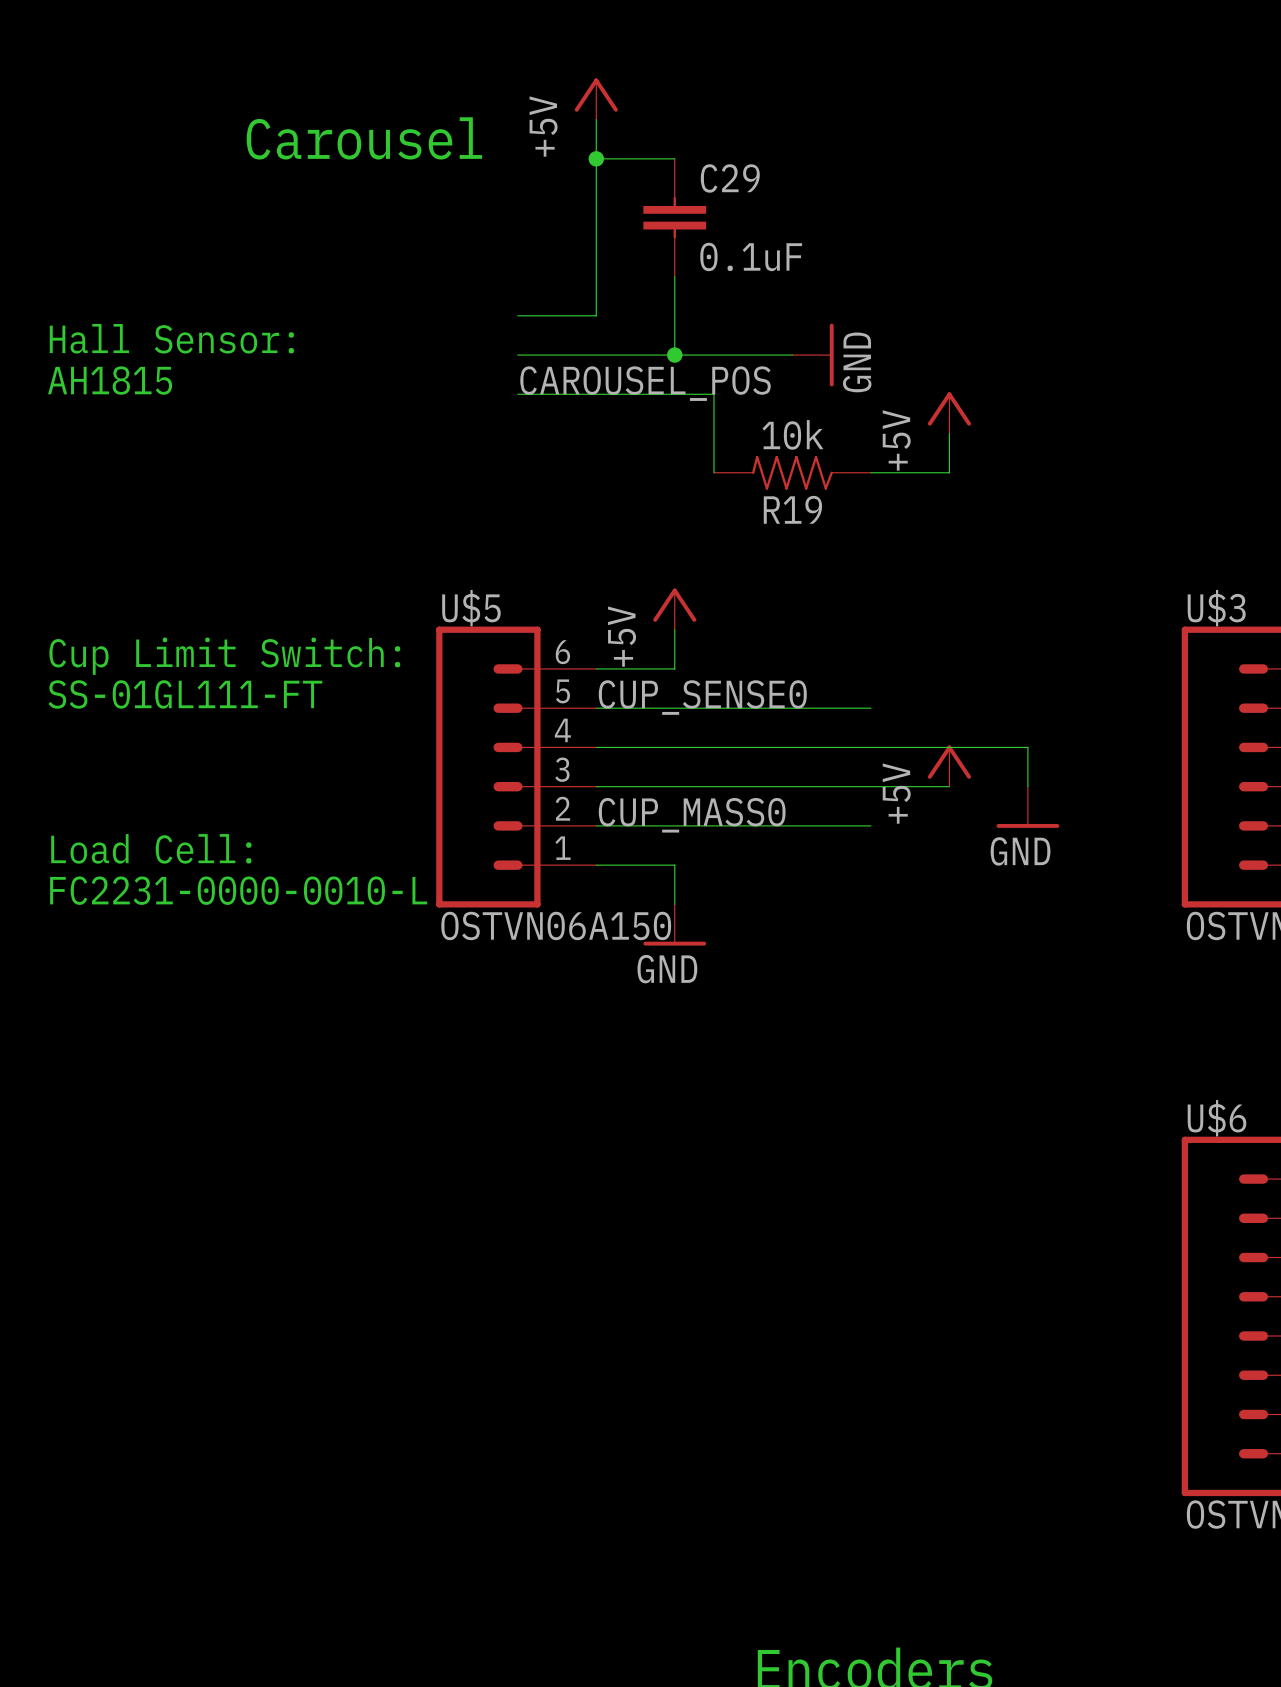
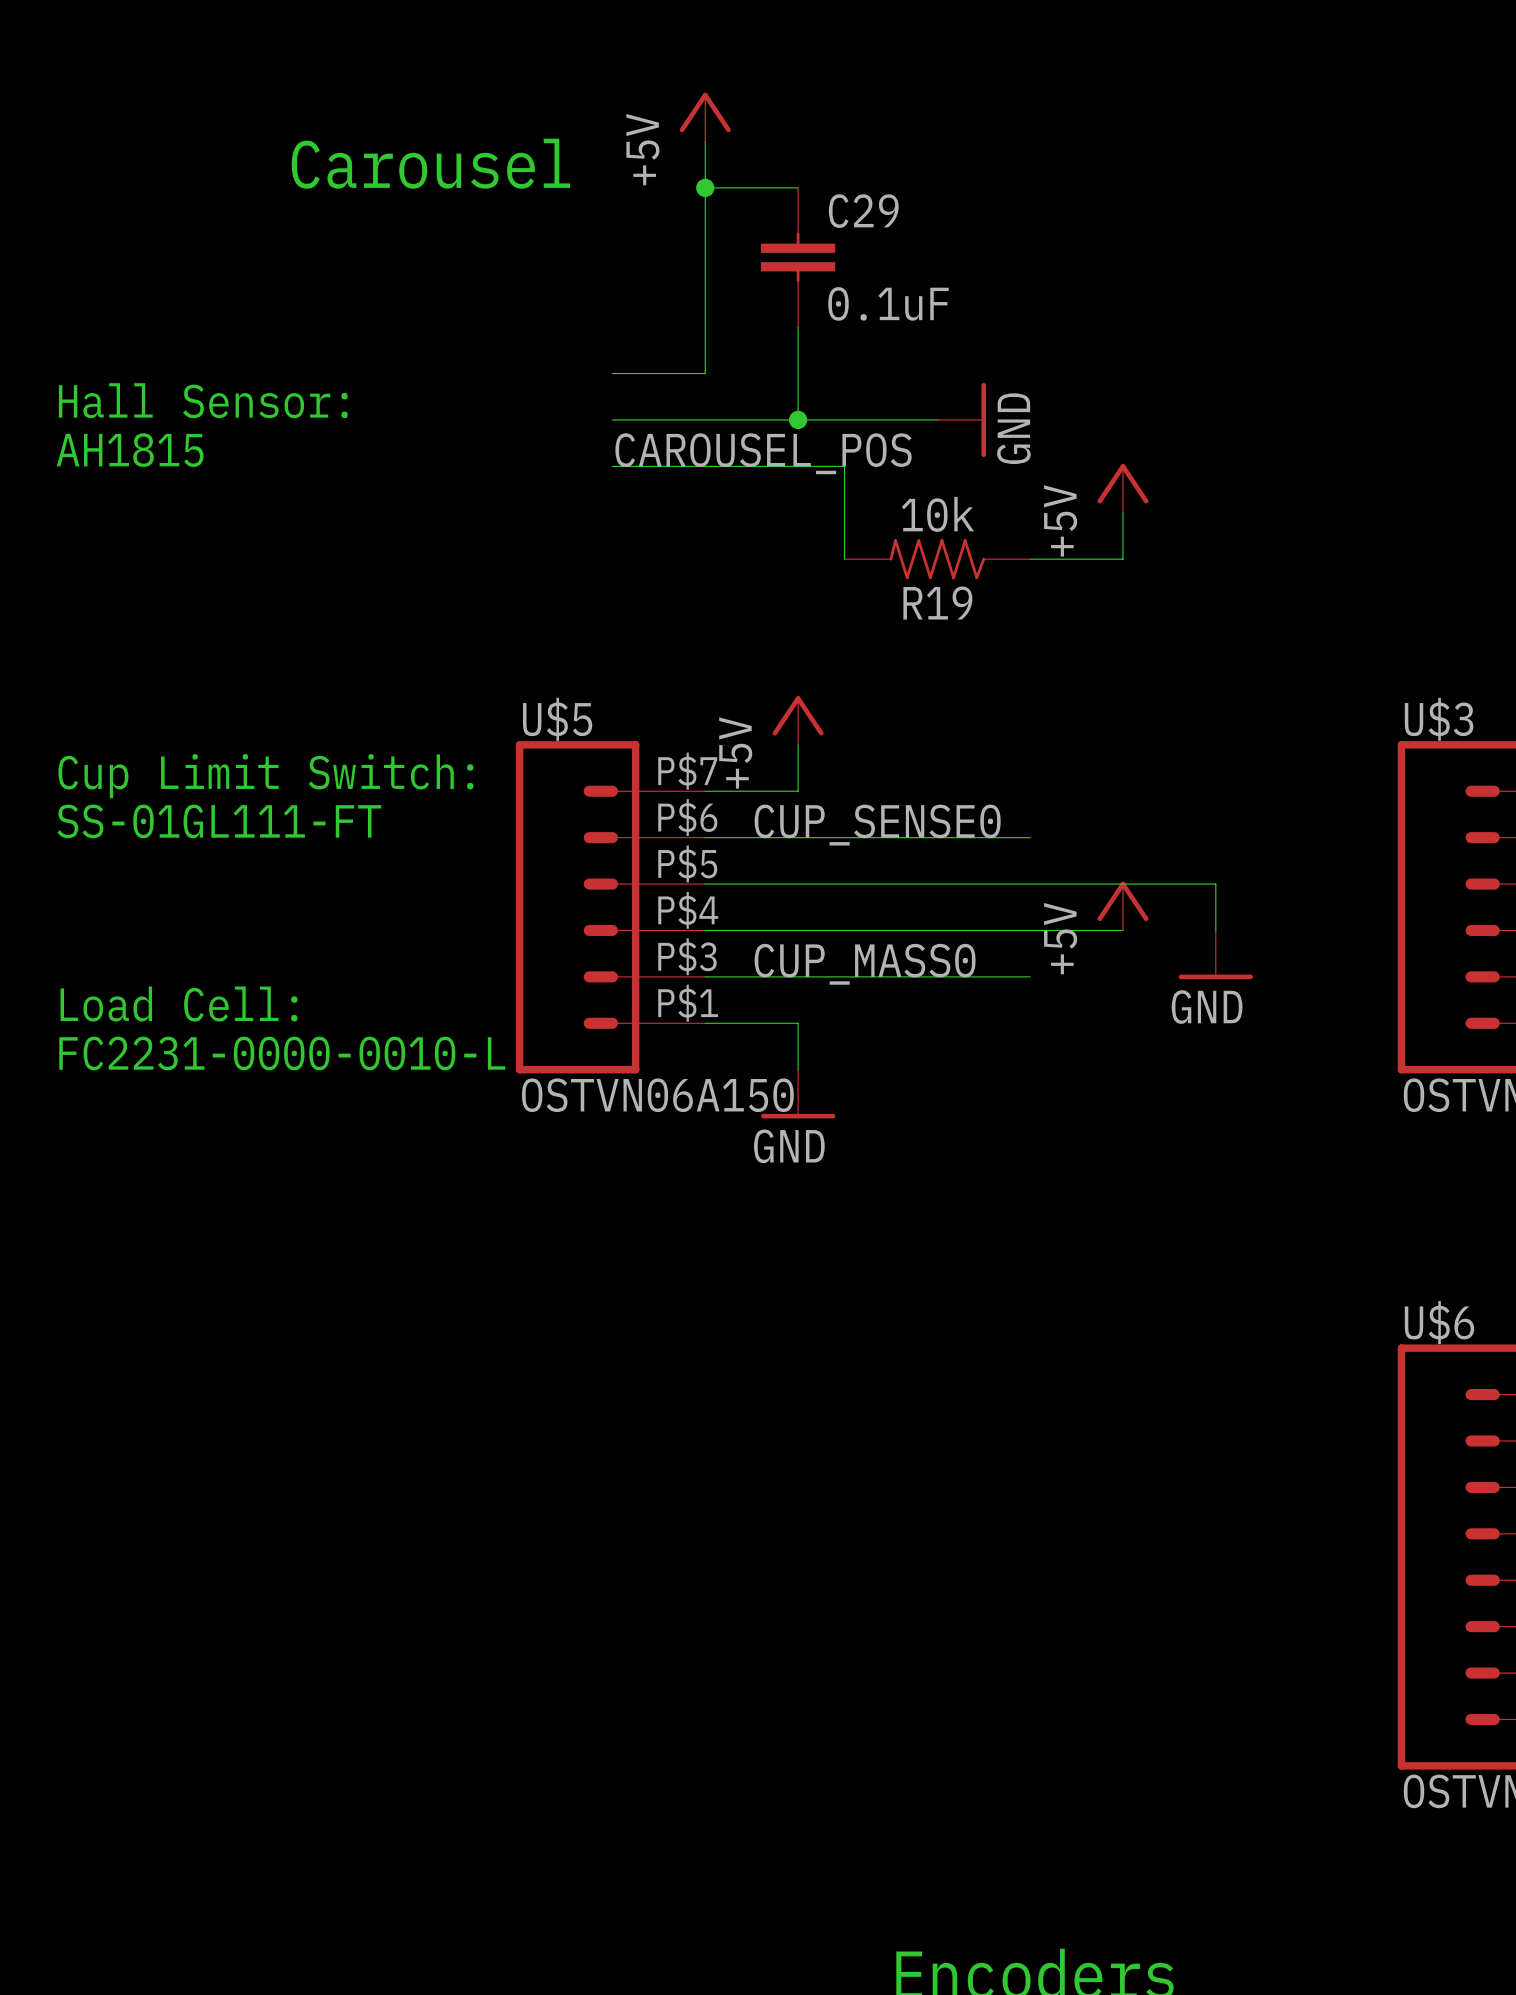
U$5 pin number: 6 (562, 652) -> P$7 (687, 771)
U$5 pin number: 5 (563, 691) -> P$6 (687, 817)
label position: CUP_SENSE0 (702, 697) -> CUP_SENSE0 (877, 825)
U$5 pin number: 4 (562, 730) -> P$5 (687, 863)
U$5 pin number: 3 (562, 769) -> P$4 (688, 910)
U$5 pin number: 2 (562, 808) -> P$3 (687, 956)
label position: CUP_MASS0 (692, 815) -> CUP_MASS0 (865, 964)
U$5 pin number: 1 (563, 848) -> P$1 (688, 1003)

